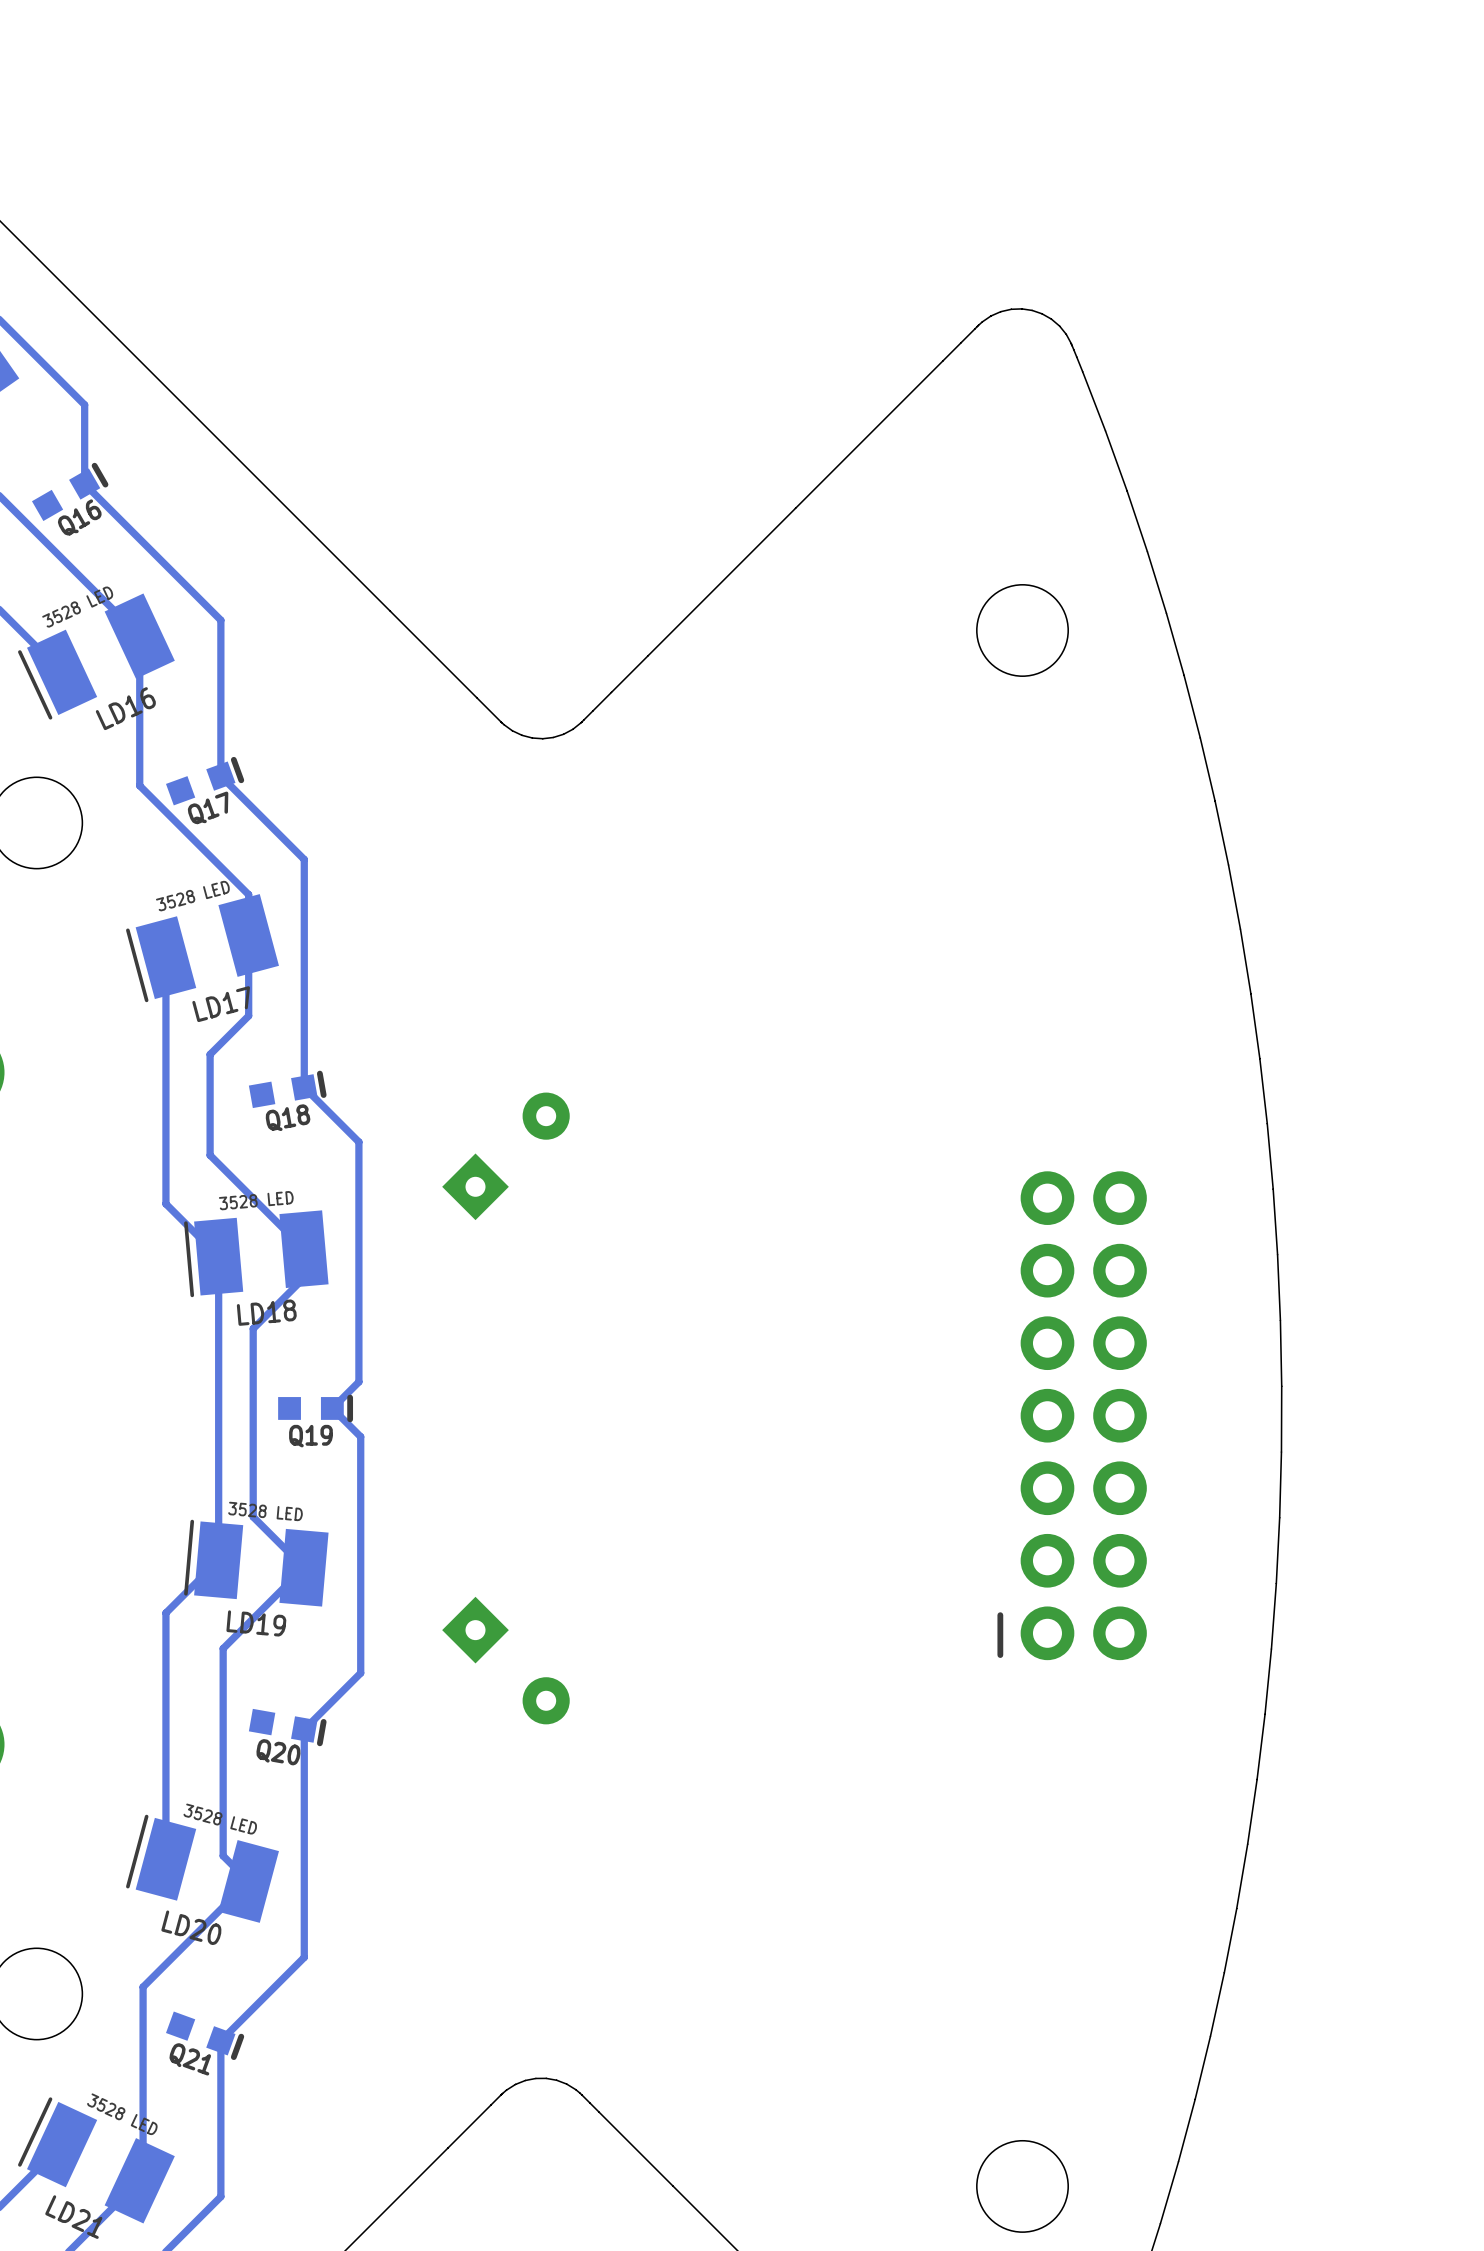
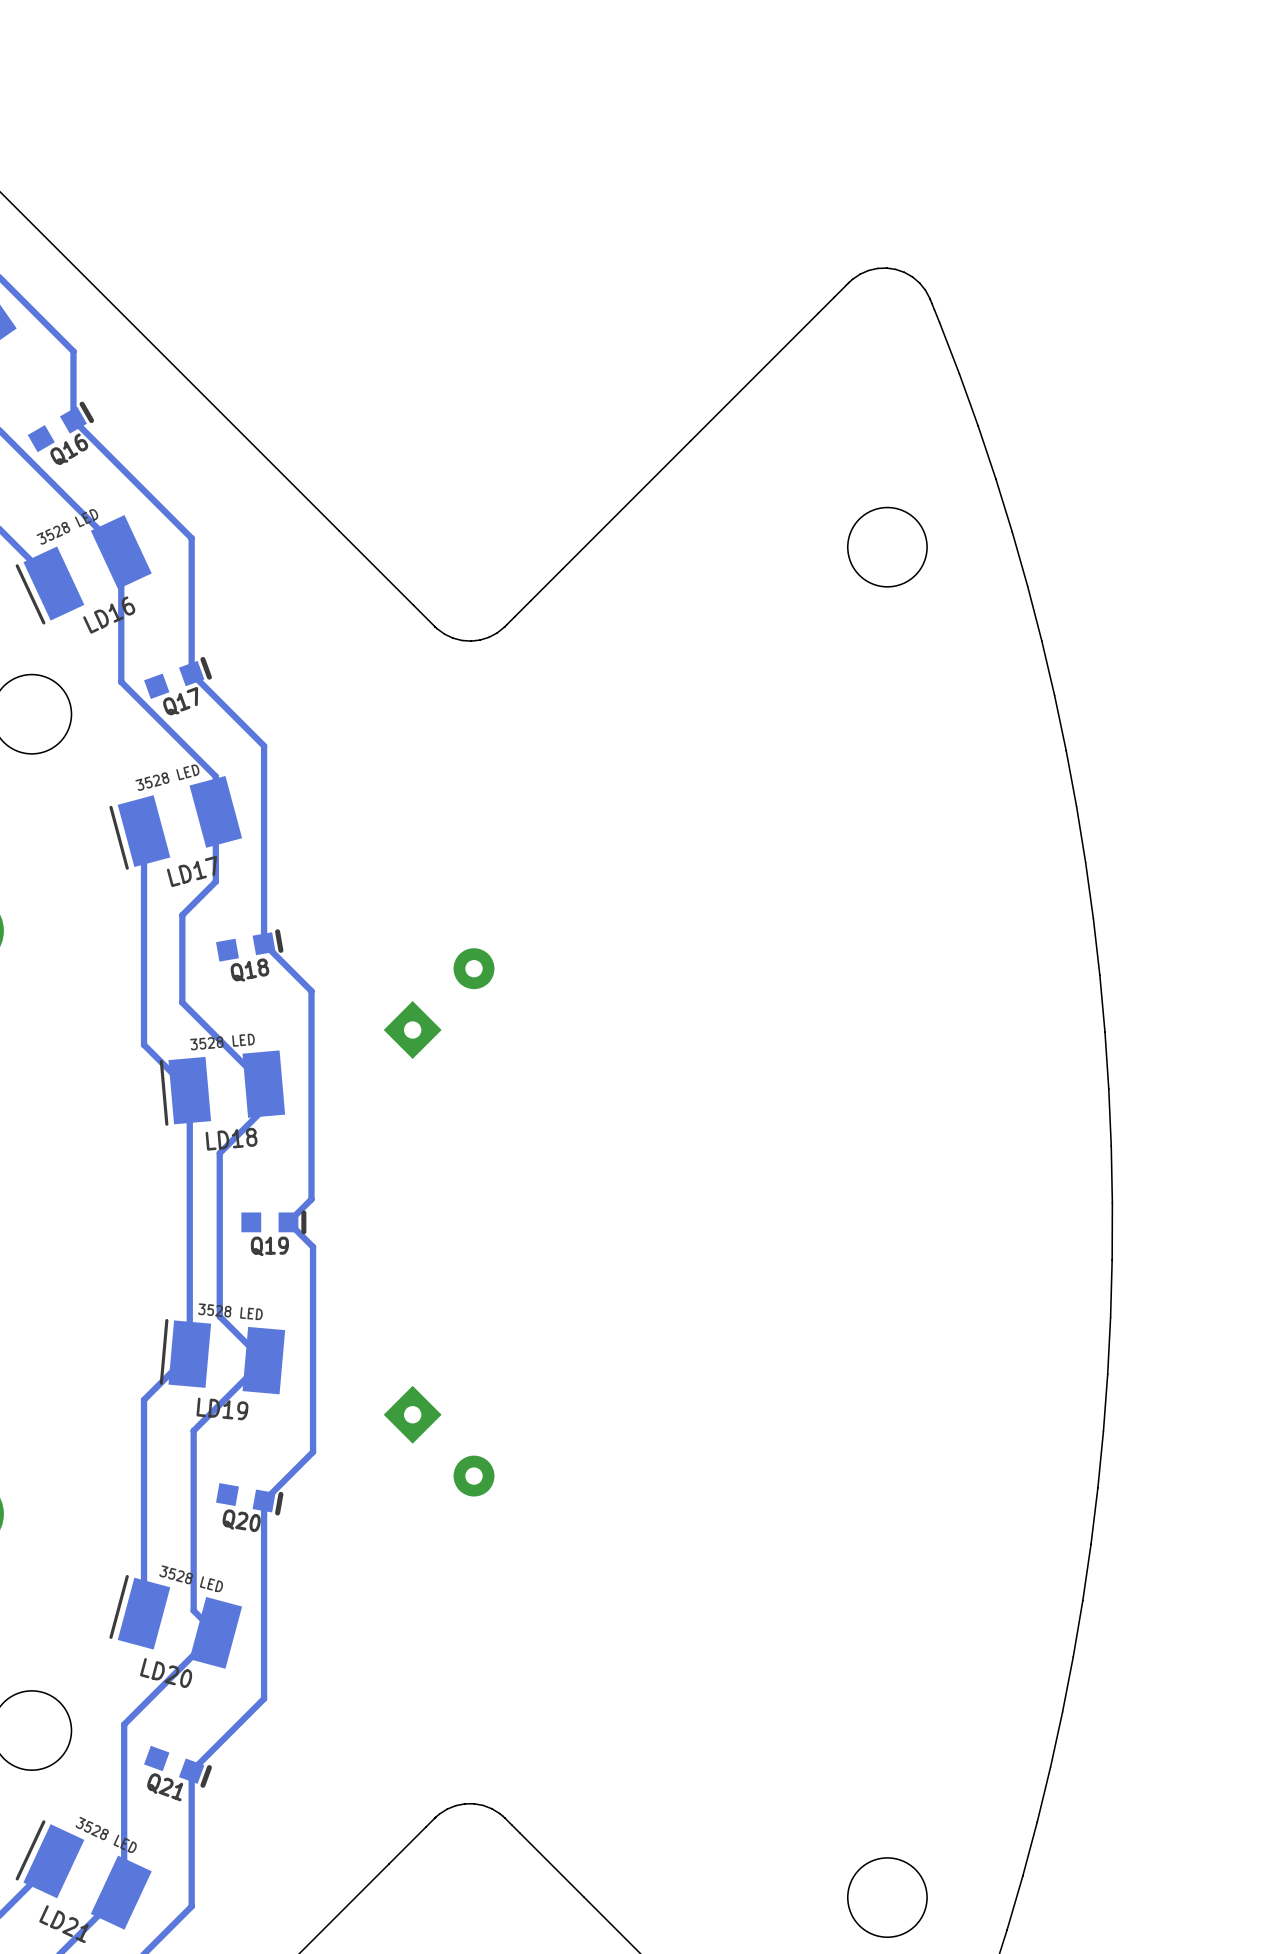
part: (1072, 1415) -> none

